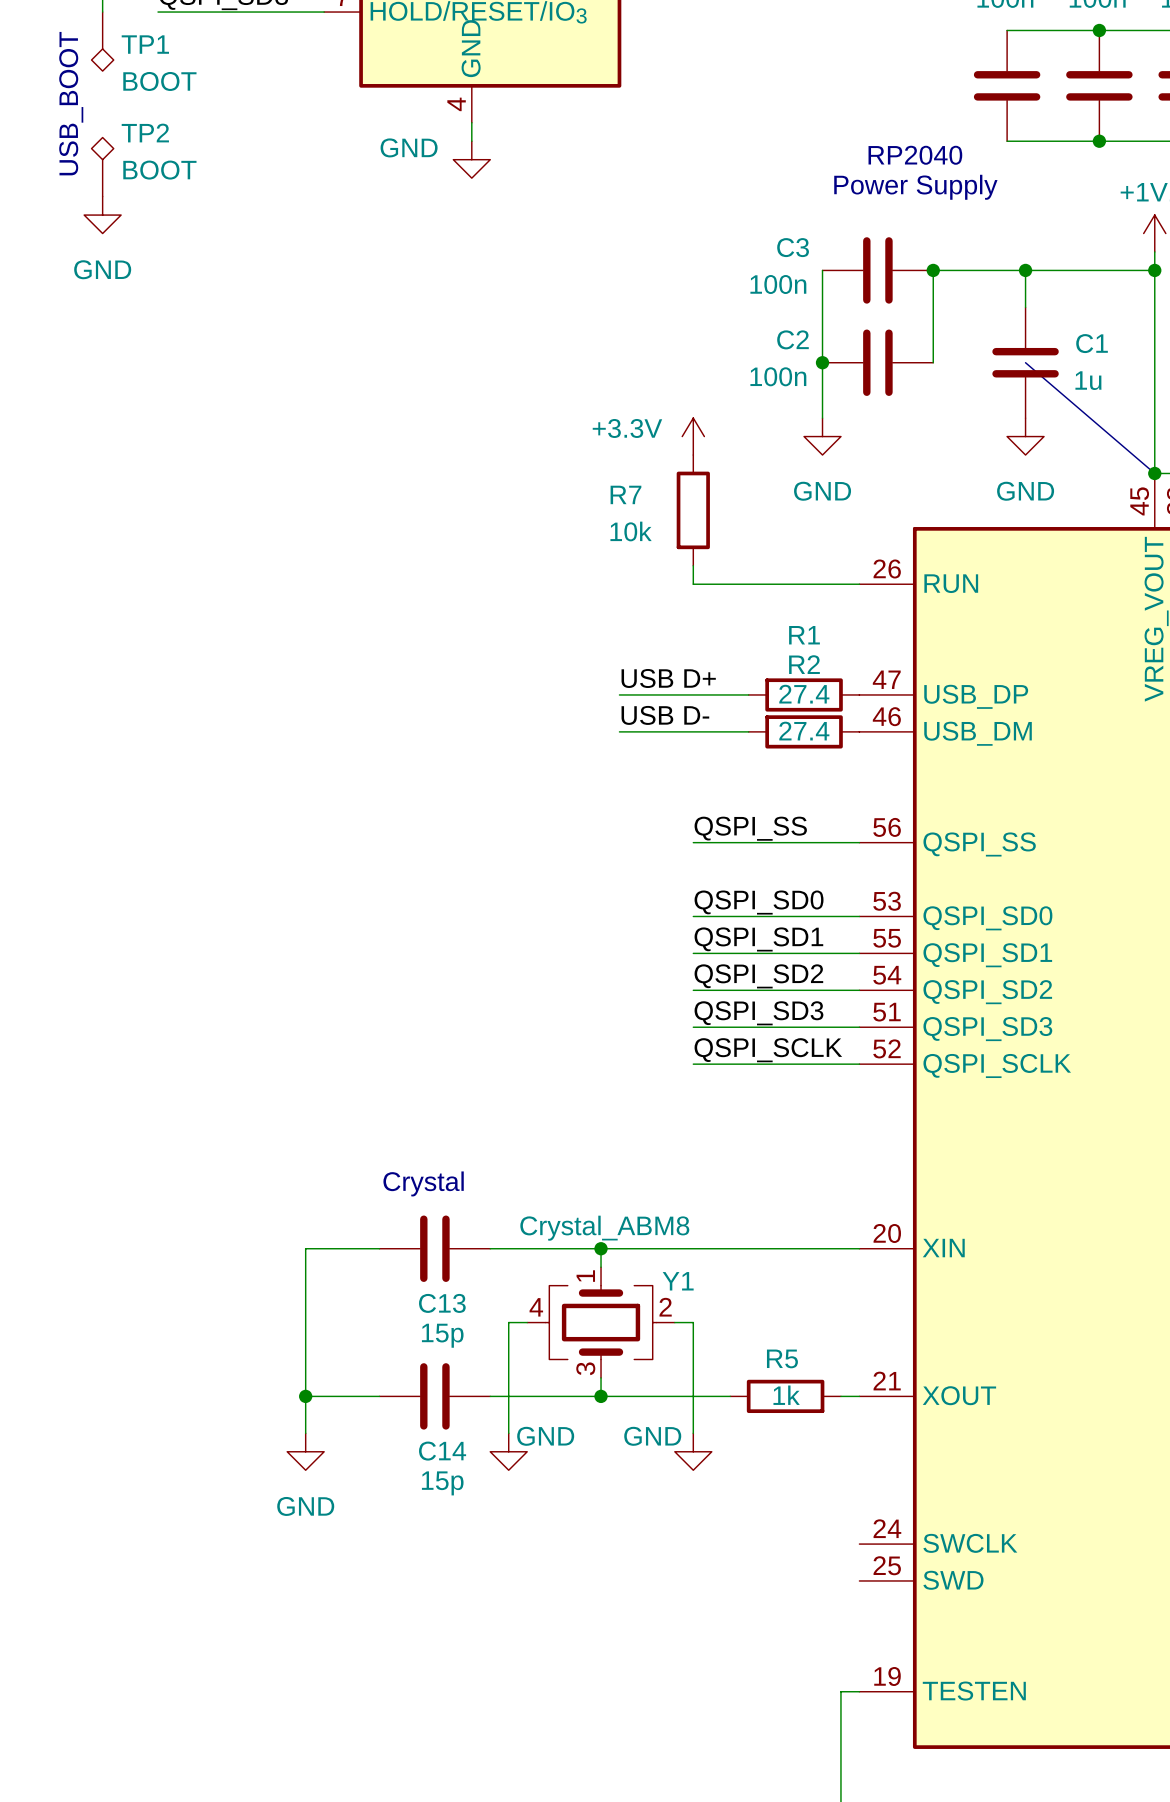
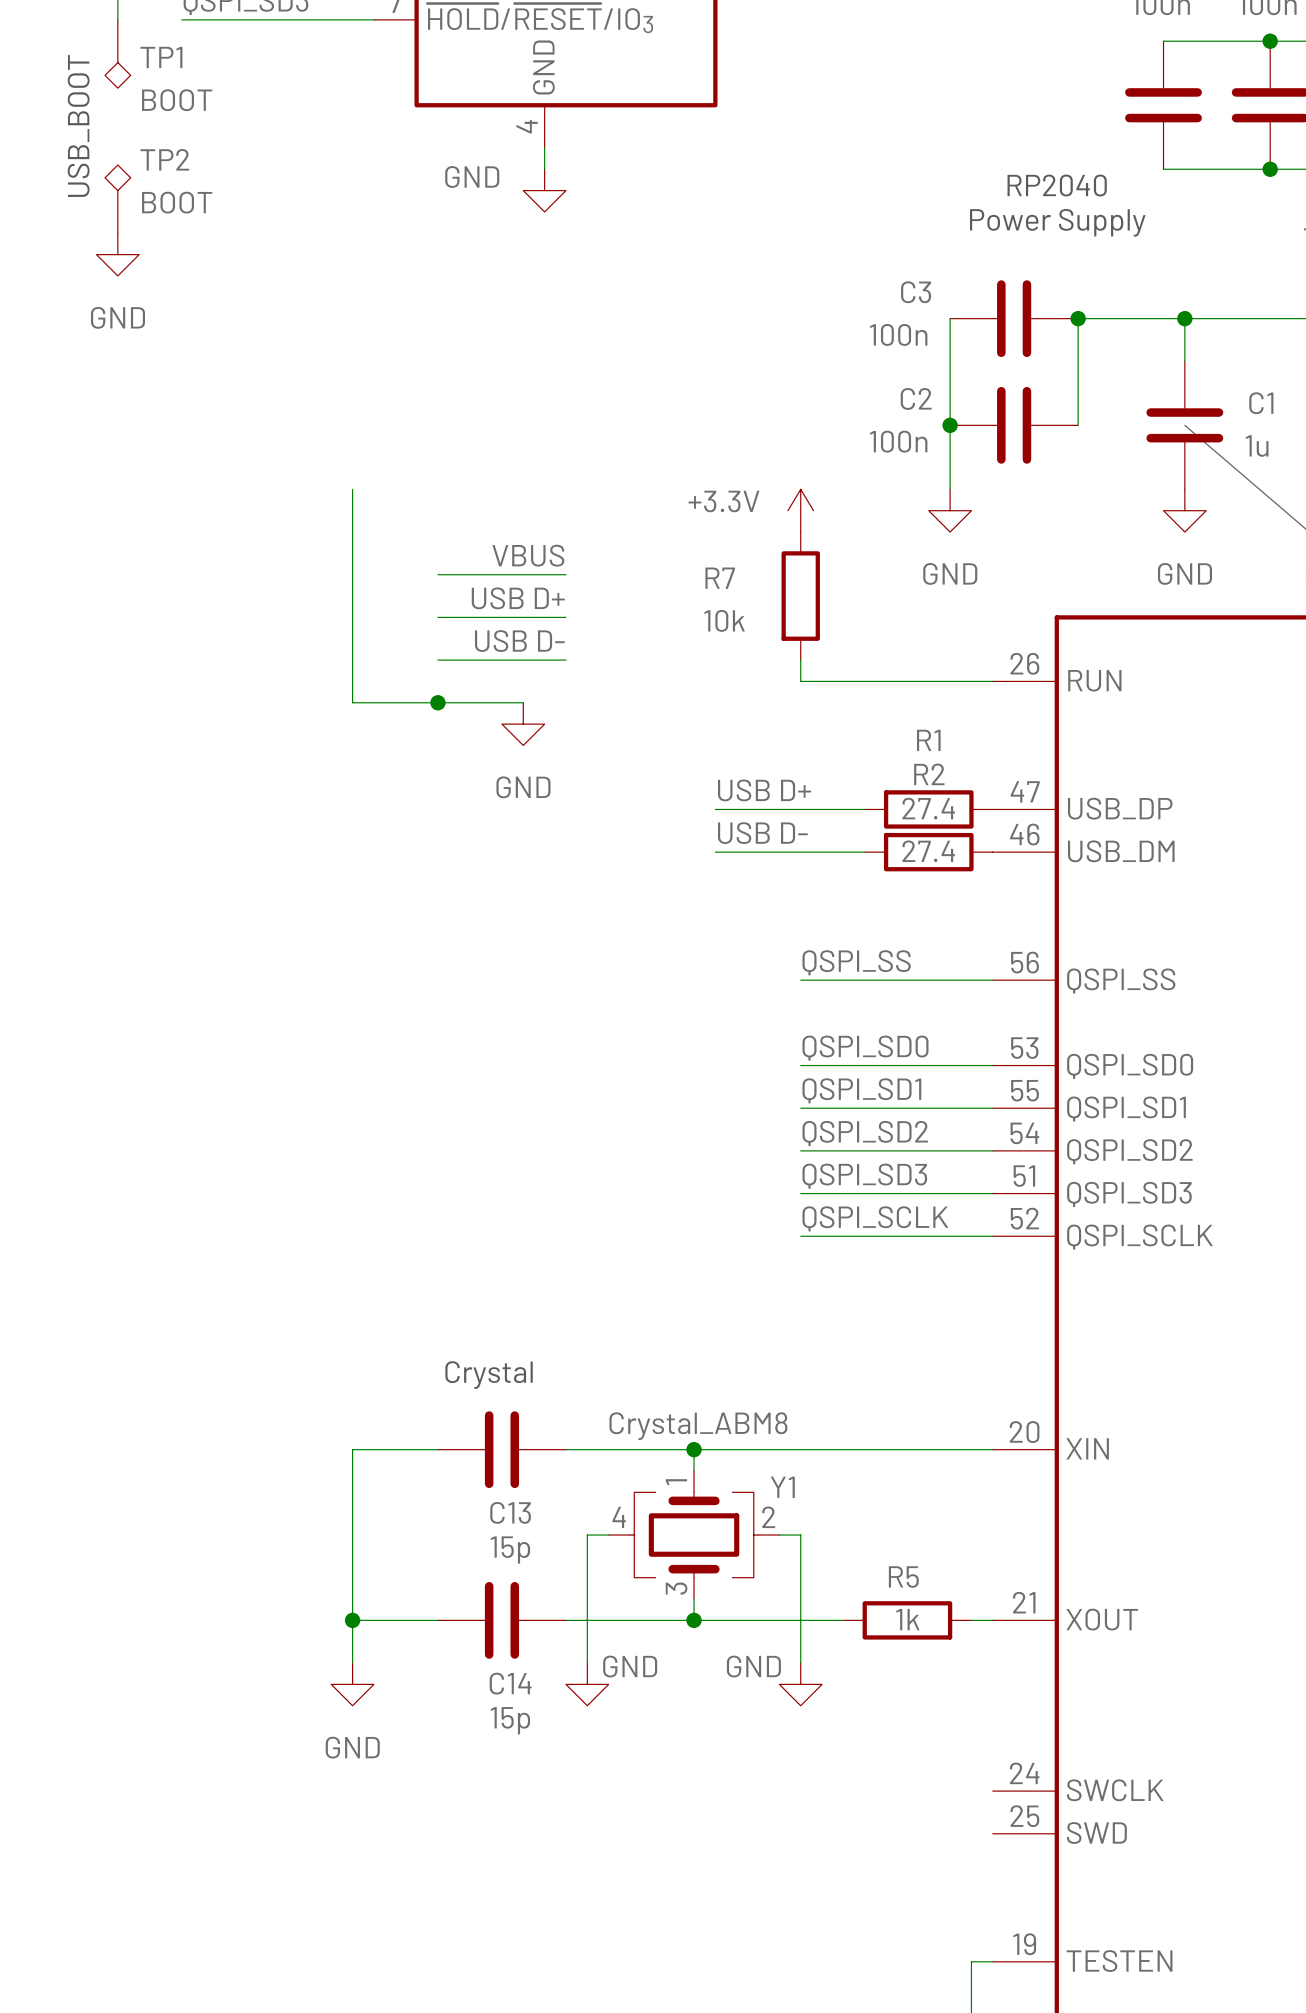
wire: none -> (352, 489) (352, 702) (523, 702)
label: none -> VBUS (528, 555)
wire: none -> (437, 574) (565, 574)
label: none -> USB D+ (518, 598)
wire: none -> (437, 617) (565, 617)
label: none -> USB D- (519, 641)
wire: none -> (437, 660) (565, 660)
junction: none -> (437, 702)
power symbol: none -> GND (523, 724)

